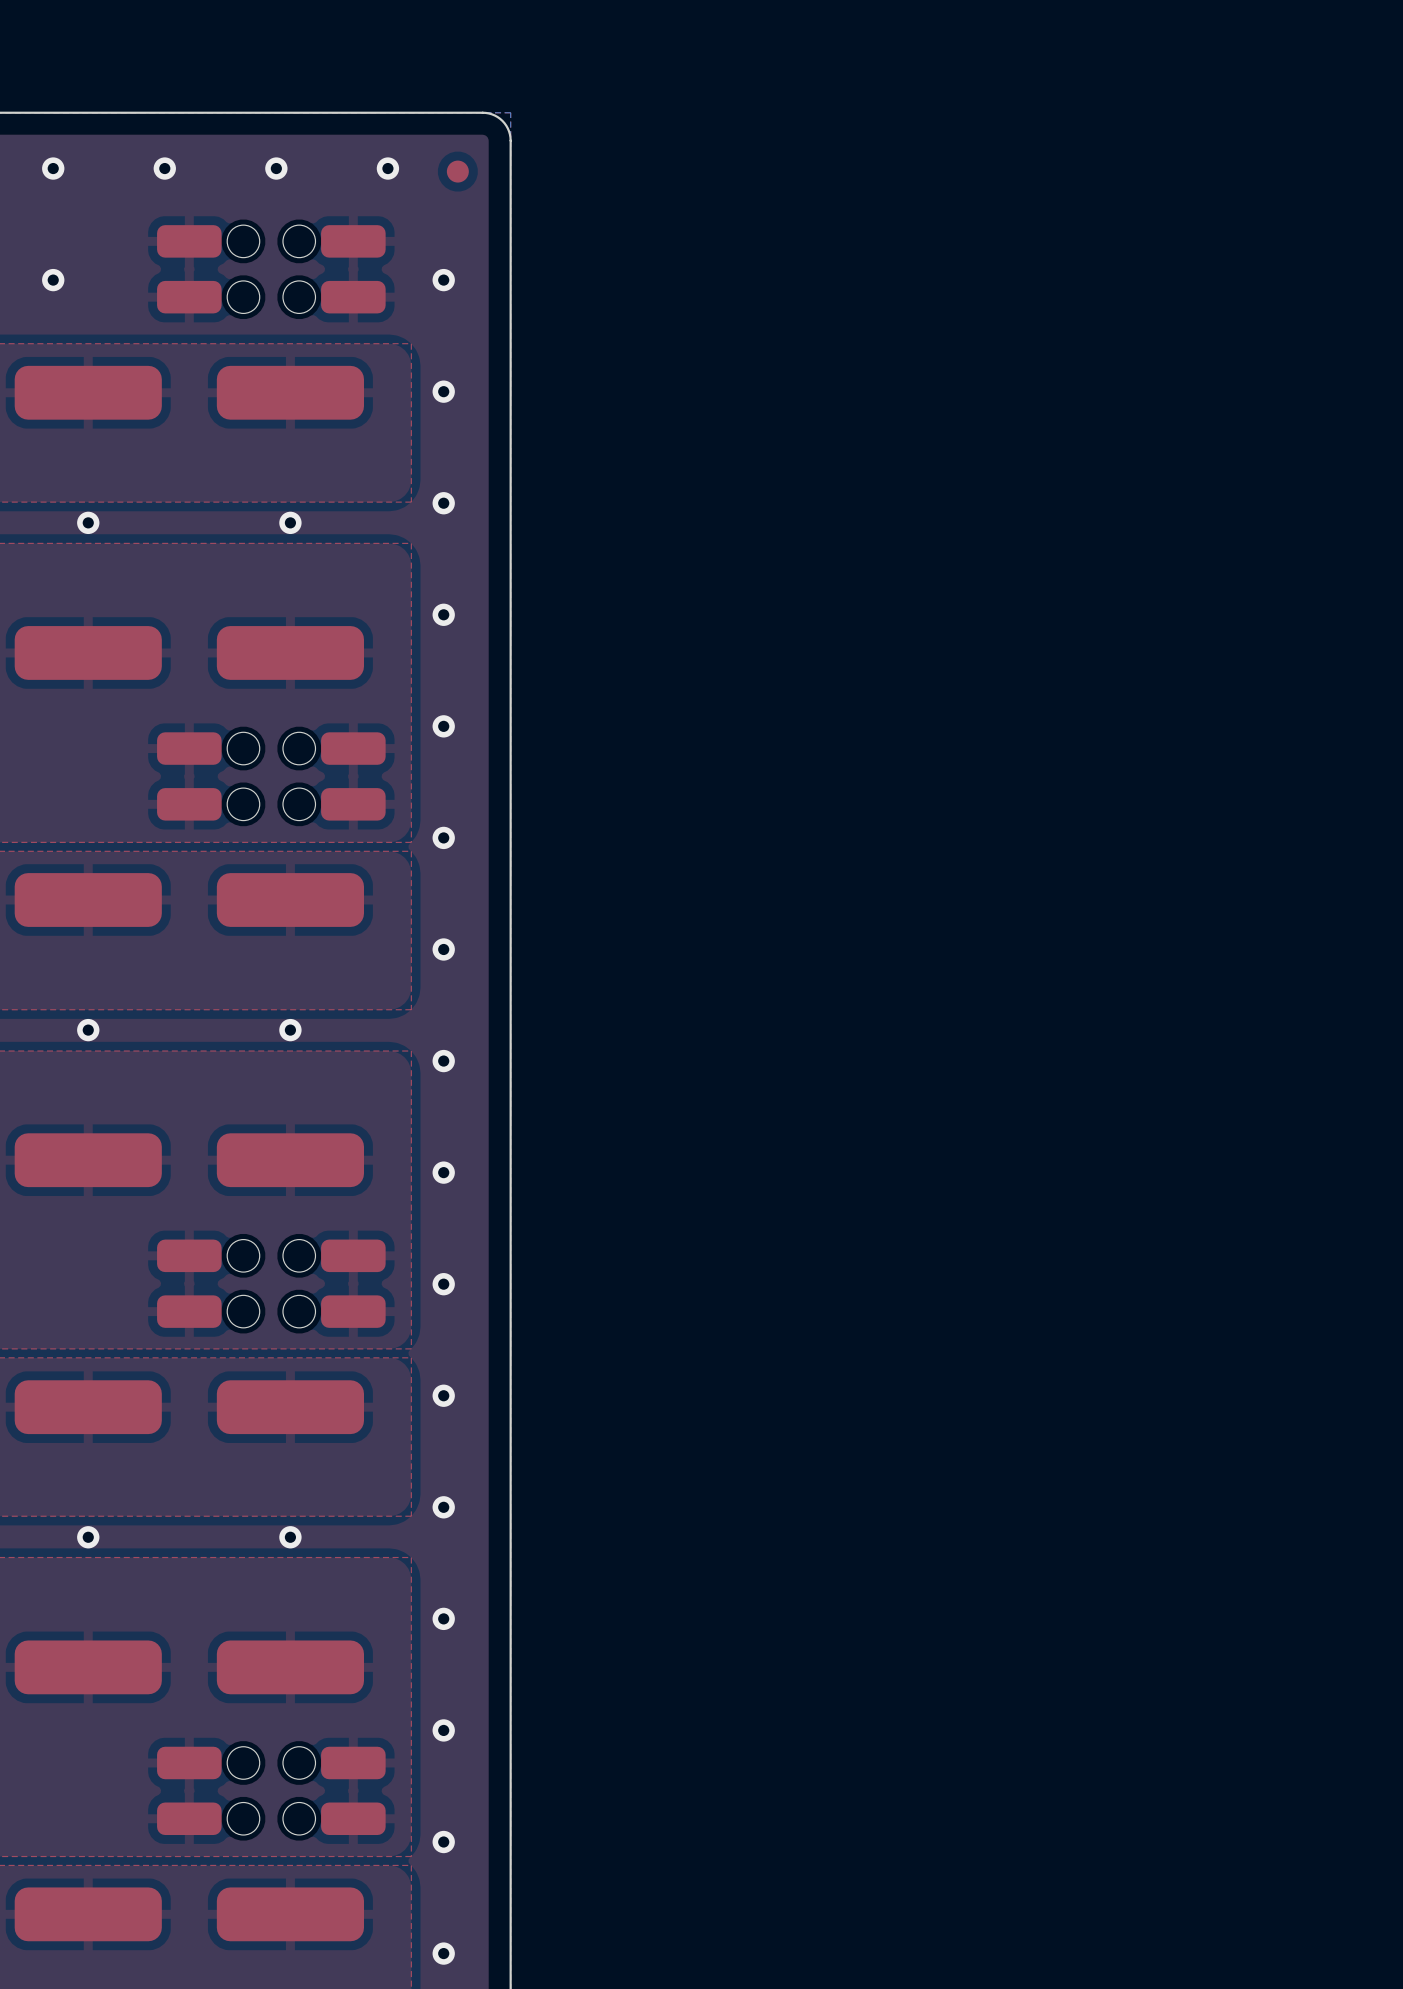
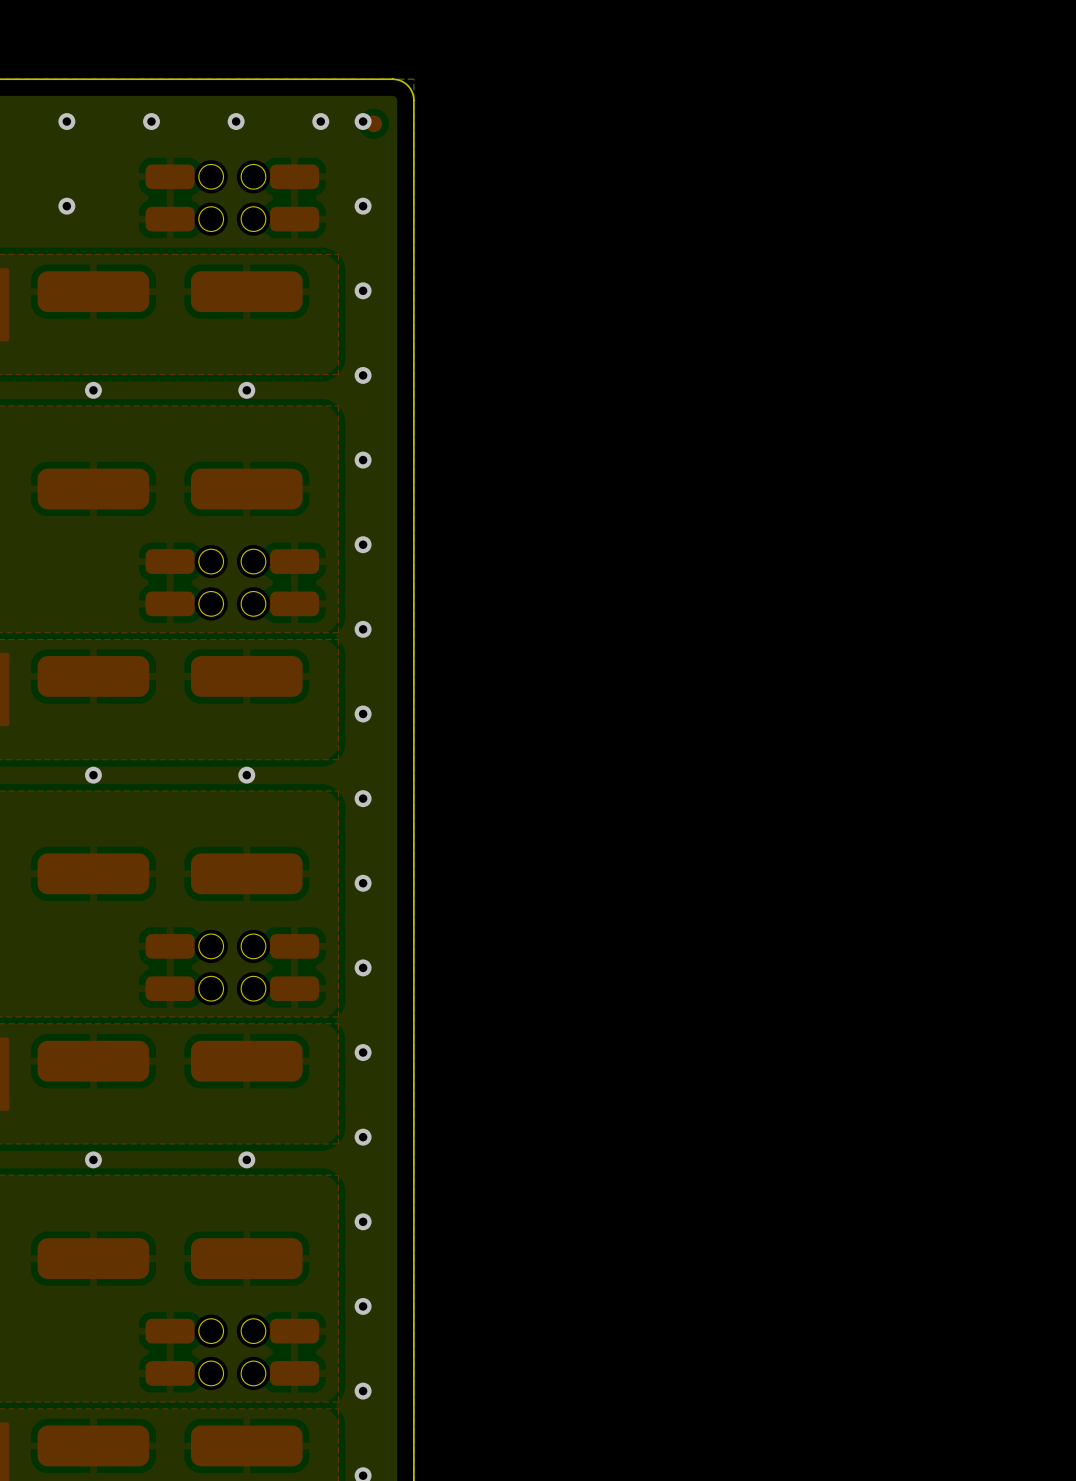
via: none -> (363, 121)

